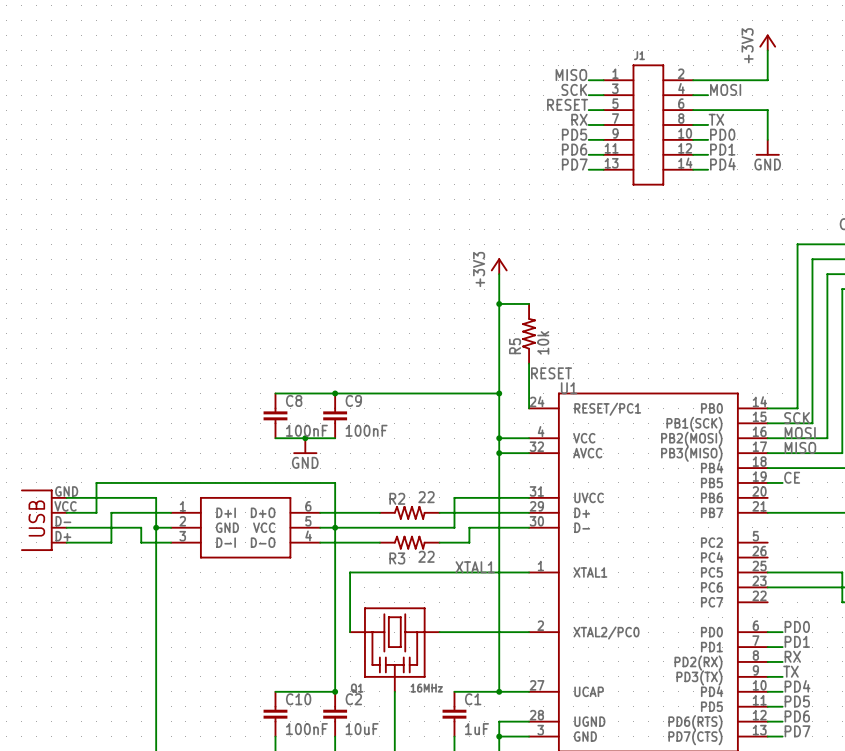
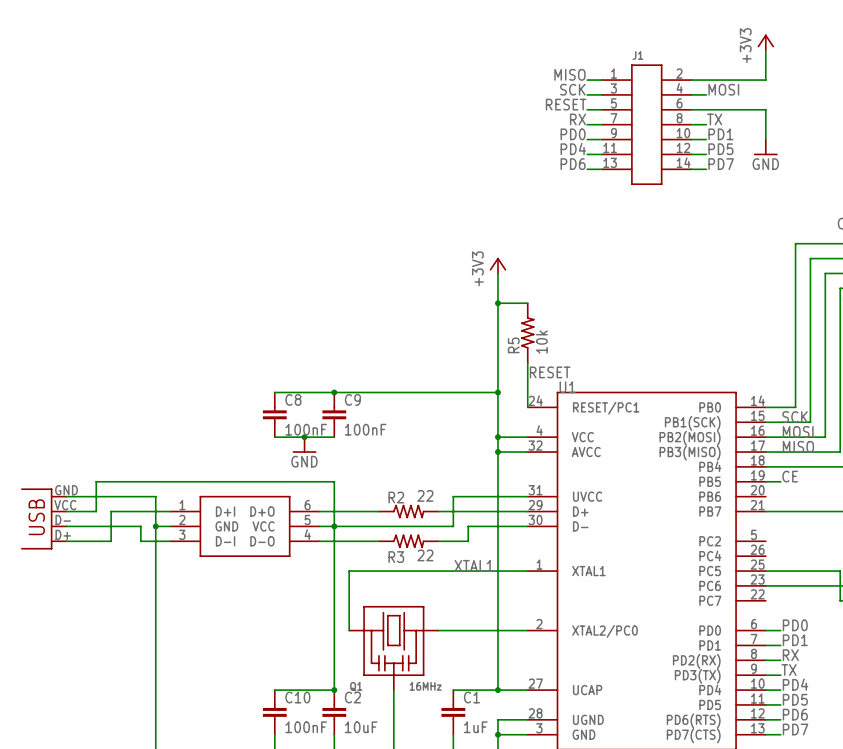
label: PD5 (574, 134) -> PD0 (573, 134)
label: PD0 (722, 134) -> PD1 (720, 134)
label: PD6 (574, 149) -> PD4 (573, 148)
label: PD1 (722, 149) -> PD5 (720, 149)
label: PD7 (574, 164) -> PD6 (573, 164)
label: PD4 (722, 164) -> PD7 (721, 164)

